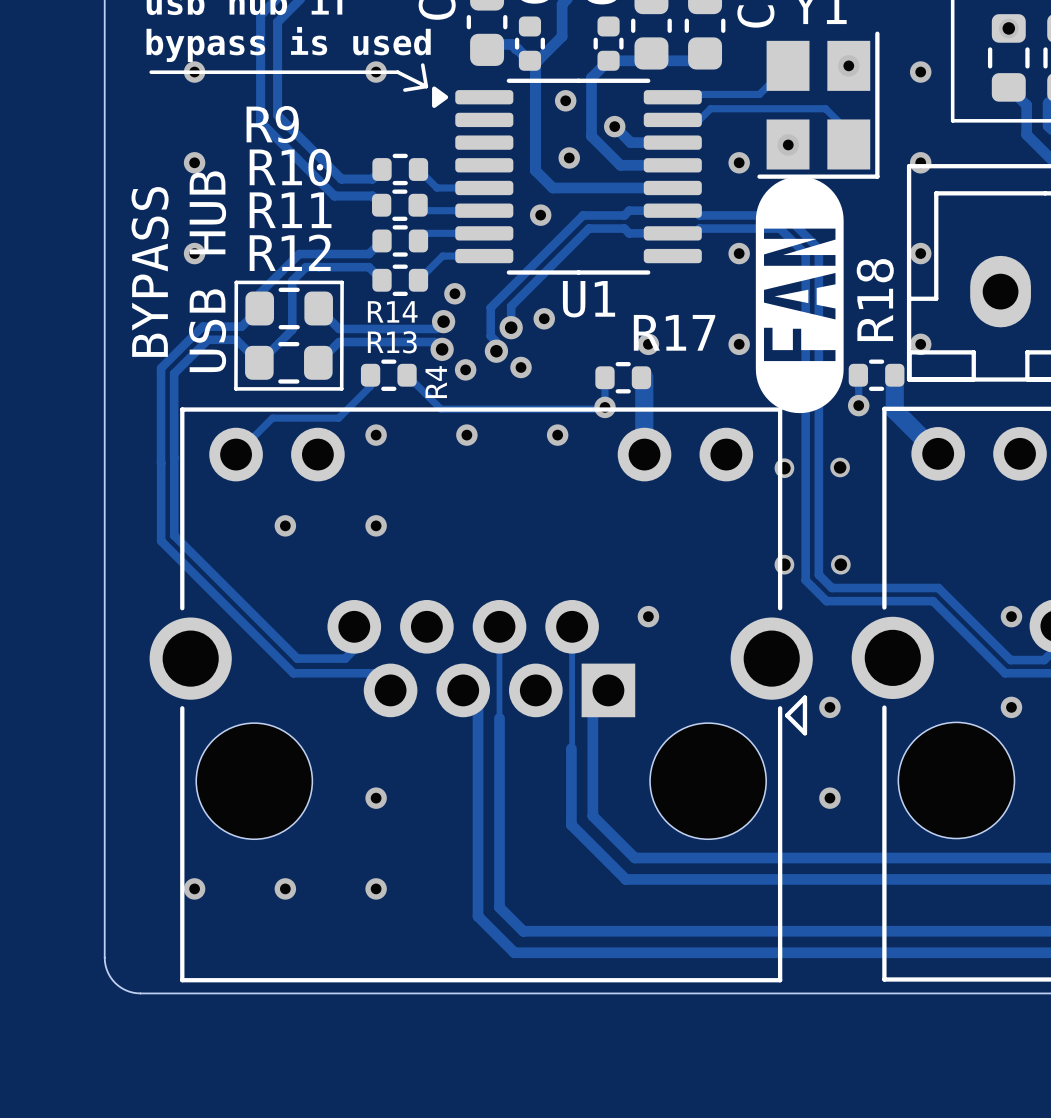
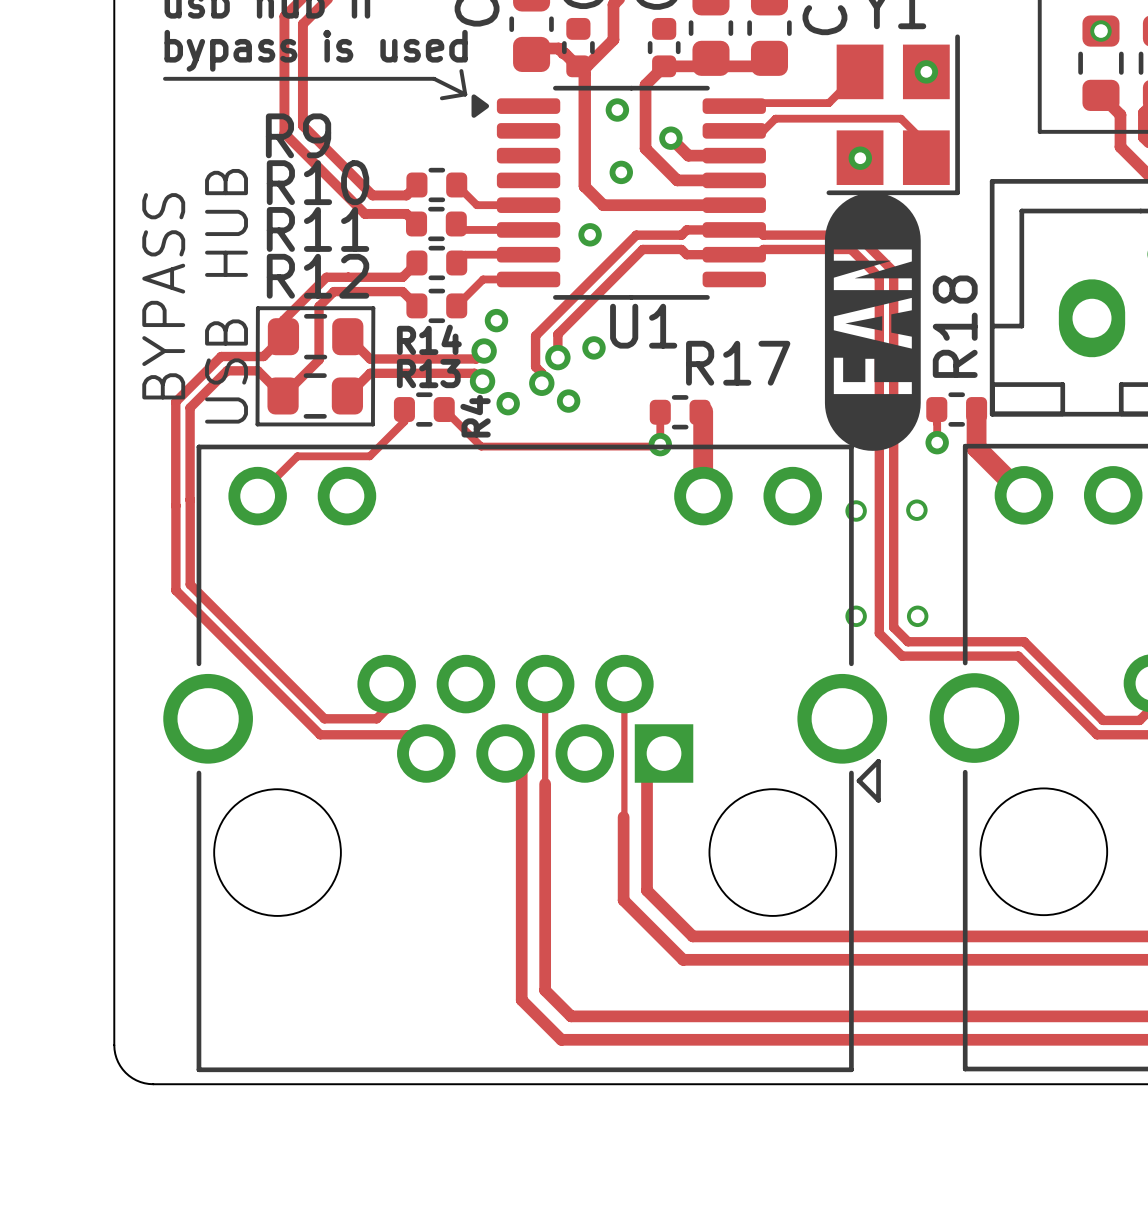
via: (194, 72) -> none
via: (376, 72) -> none
via: (920, 72) -> none
via: (194, 162) -> none
via: (739, 162) -> none
via: (920, 162) -> none
via: (194, 253) -> none
via: (739, 253) -> none
via: (920, 253) -> none
via: (648, 344) -> none
via: (739, 344) -> none
via: (920, 344) -> none
via: (376, 435) -> none
via: (466, 435) -> none
via: (557, 435) -> none
via: (285, 525) -> none
via: (376, 525) -> none
via: (648, 616) -> none
via: (1011, 616) -> none
via: (829, 707) -> none
via: (1011, 707) -> none
via: (376, 798) -> none
via: (829, 798) -> none
via: (194, 888) -> none
via: (285, 888) -> none
via: (376, 888) -> none

